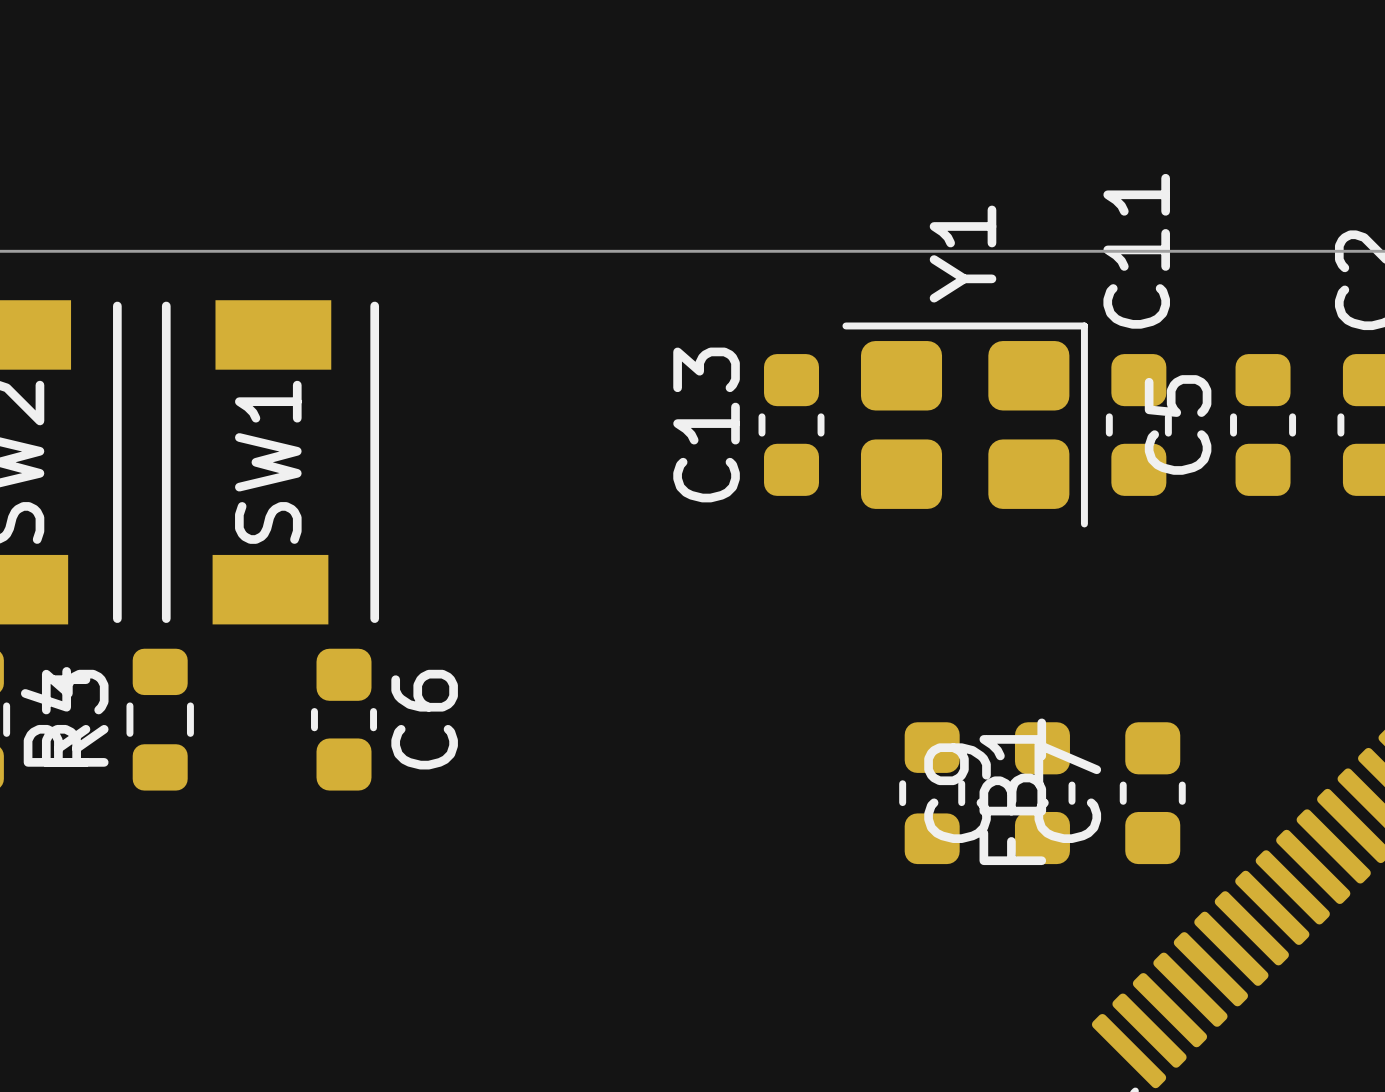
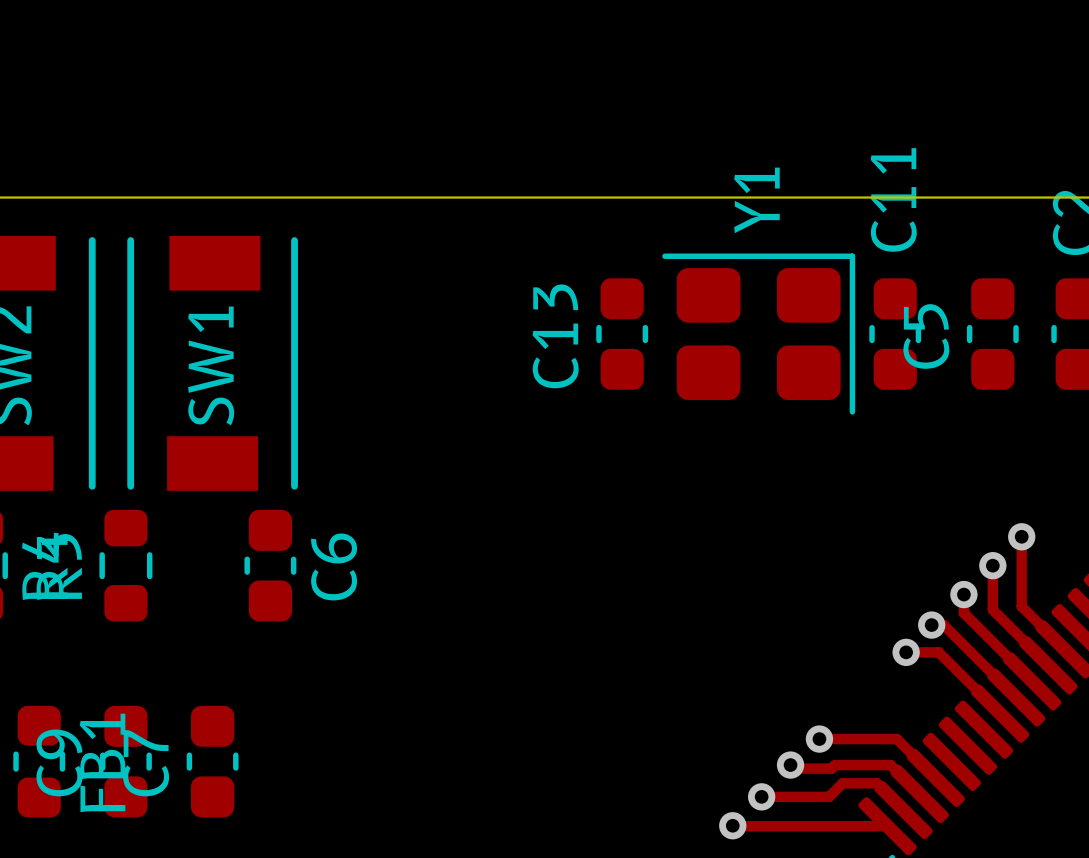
track: none -> (1021, 536) (1021, 606) (1064, 649)
via: none -> (1021, 536)
track: none -> (992, 565) (992, 609) (1048, 665)
via: none -> (992, 565)
track: none -> (963, 594) (963, 613) (1032, 681)
via: none -> (963, 594)
FB1 position: (932, 793) -> (39, 761)
C9 position: (1042, 793) -> (125, 761)
C7 position: (1152, 793) -> (212, 761)
track: none -> (931, 625) (943, 625) (1016, 697)
via: none -> (931, 625)
track: none -> (906, 652) (938, 652) (1000, 713)
via: none -> (906, 652)
track: none -> (819, 739) (896, 739) (935, 777)
via: none -> (819, 739)
track: none -> (790, 765) (794, 768) (831, 768) (835, 765) (890, 765) (919, 794)
via: none -> (790, 765)
track: none -> (761, 796) (829, 796) (842, 783) (876, 783) (903, 810)
via: none -> (761, 796)
via: none -> (732, 825)
track: none -> (733, 826) (887, 826)

